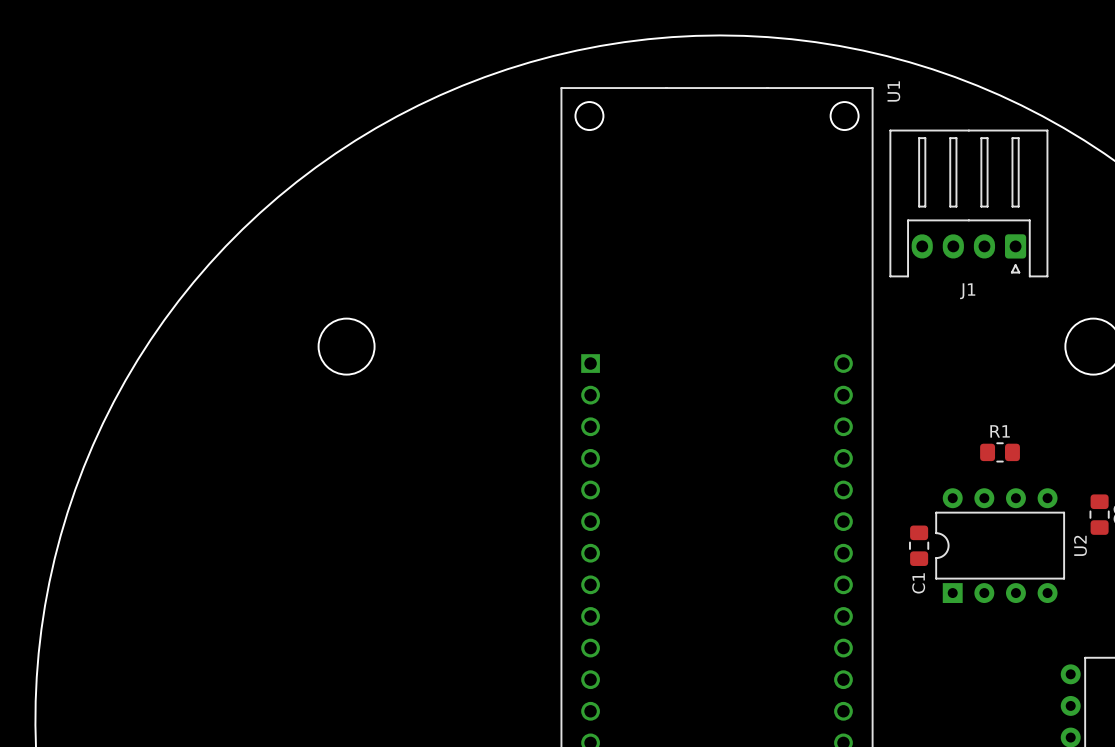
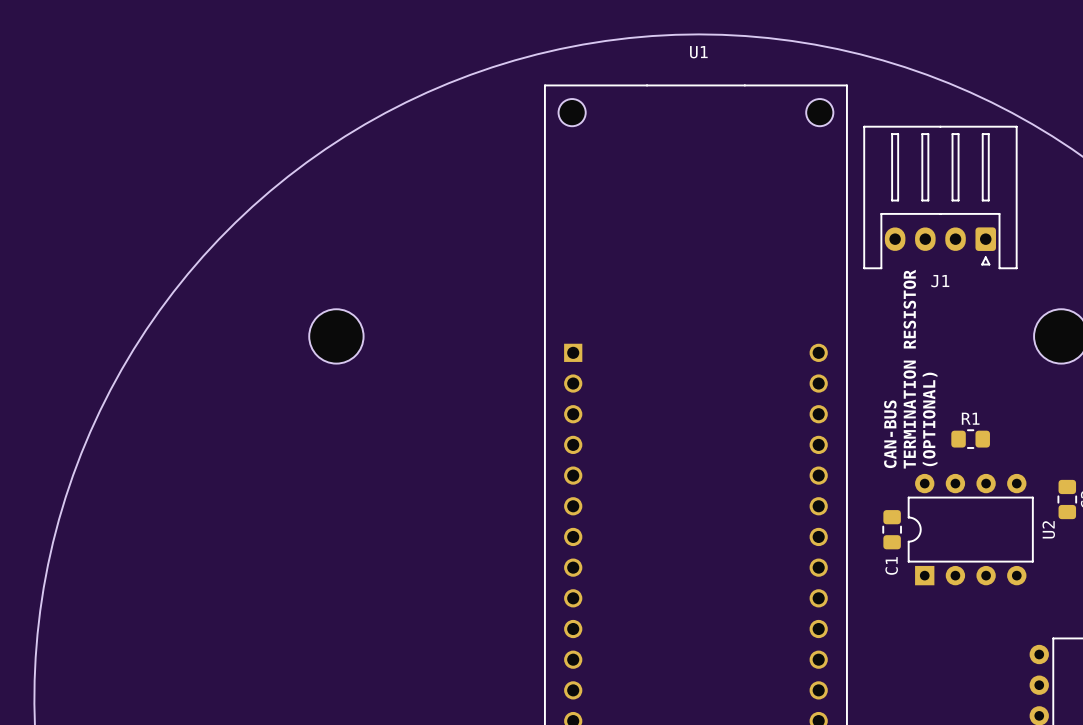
U1 name rotation: 0° (893, 91) -> 90° clockwise (698, 52)
U1 name position: U1 (893, 91) -> U1 (698, 52)
text: none -> TERMINATION RESISTOR (909, 369)
text: none -> (OPTIONAL) (930, 419)
text: none -> CAN-BUS (890, 434)

